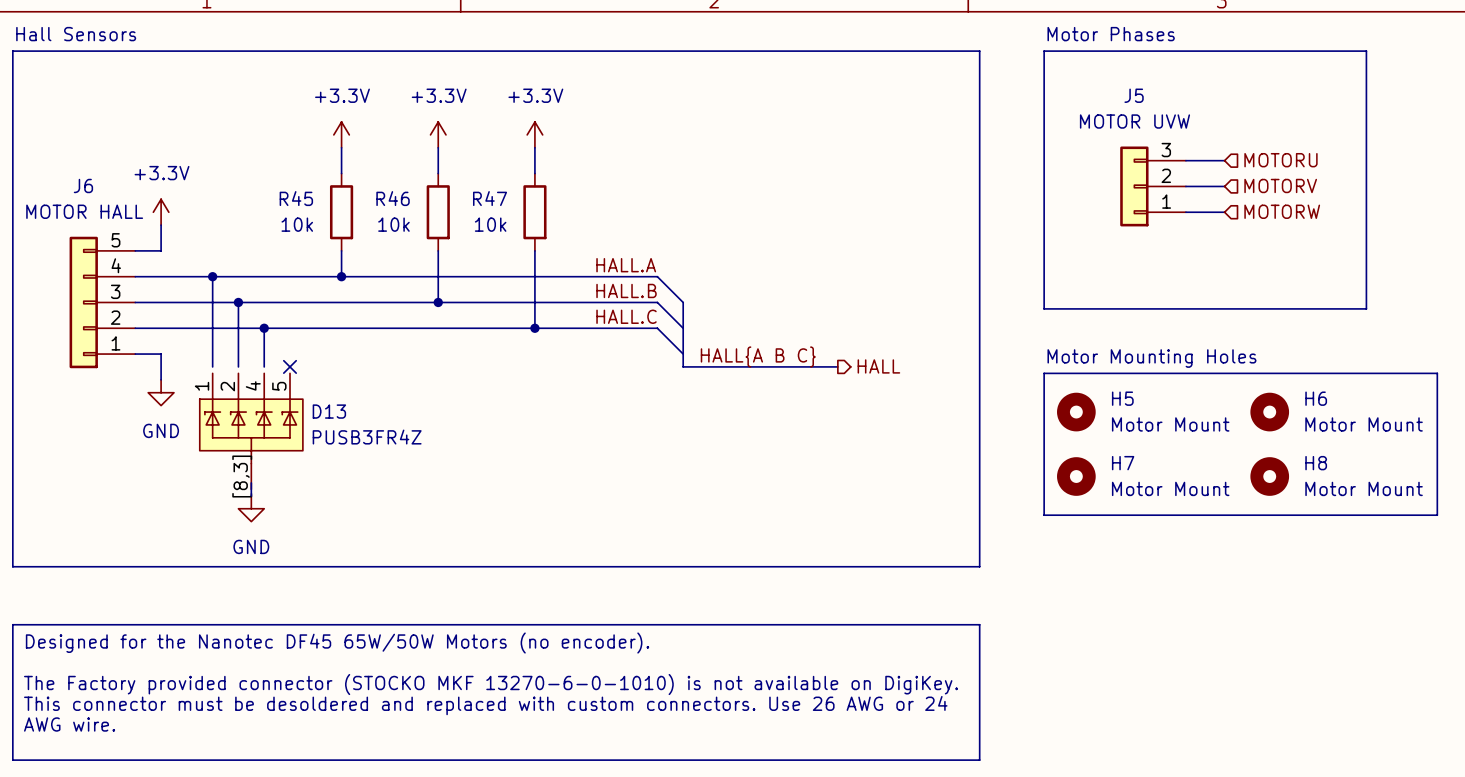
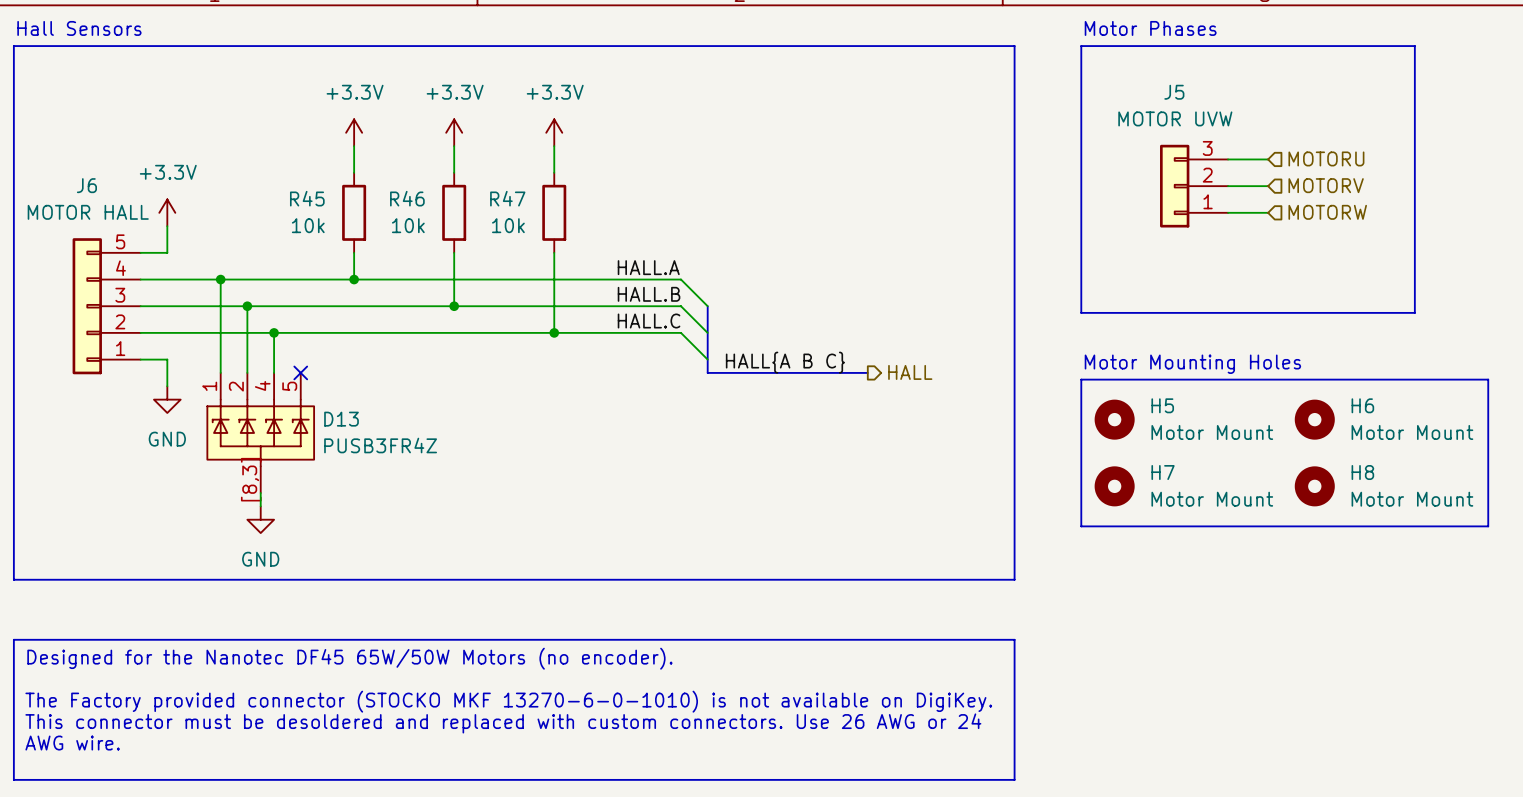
D13 symbol: [199, 373, 303, 490] -> [207, 372, 315, 494]

